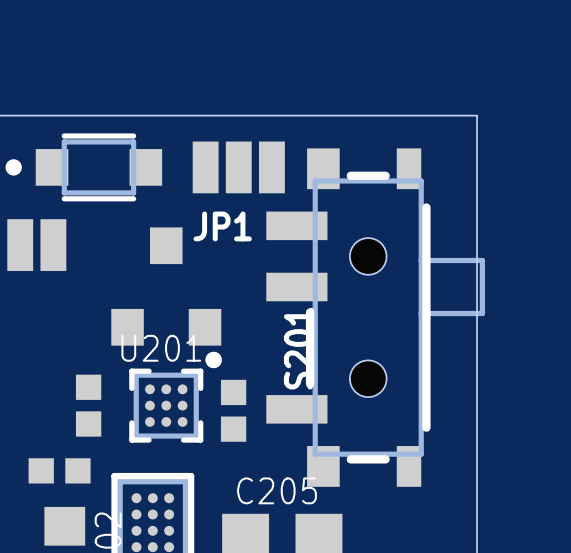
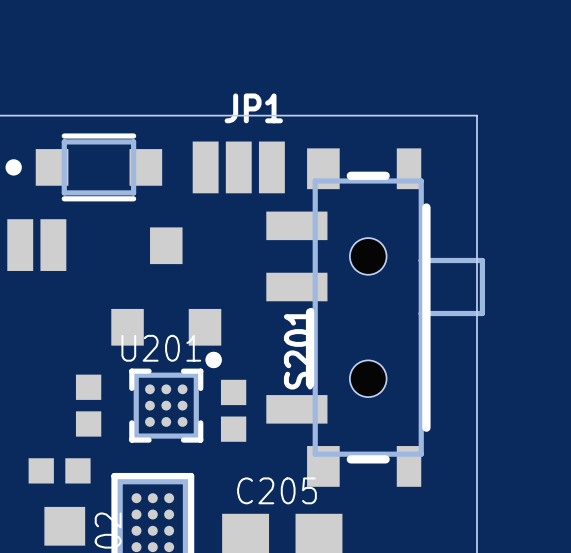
JP1 name position: JP1 (222, 226) -> JP1 (253, 108)

